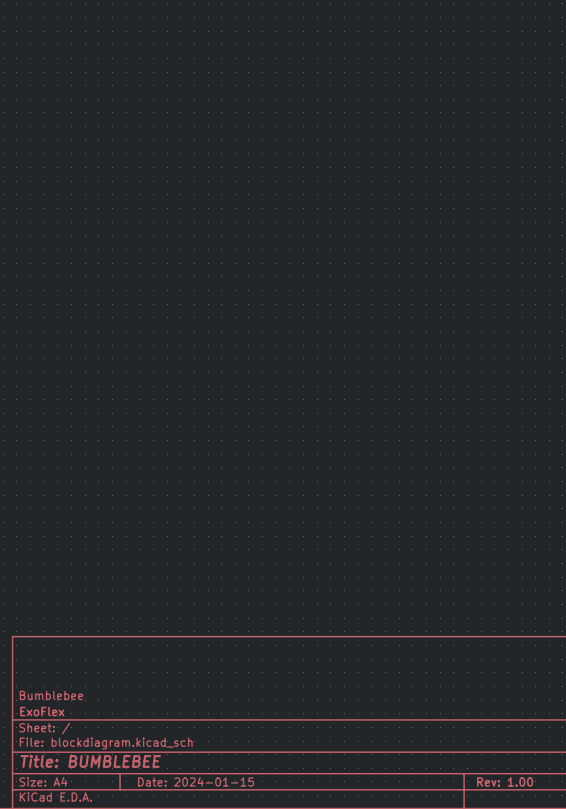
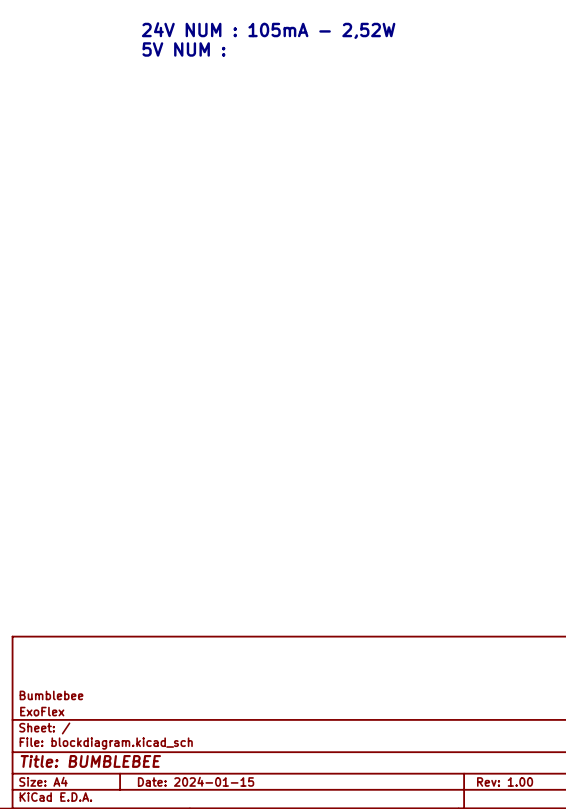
text: none -> 24V NUM : 105mA - 2,52W (268, 30)
text: none -> 5V NUM : (183, 49)

